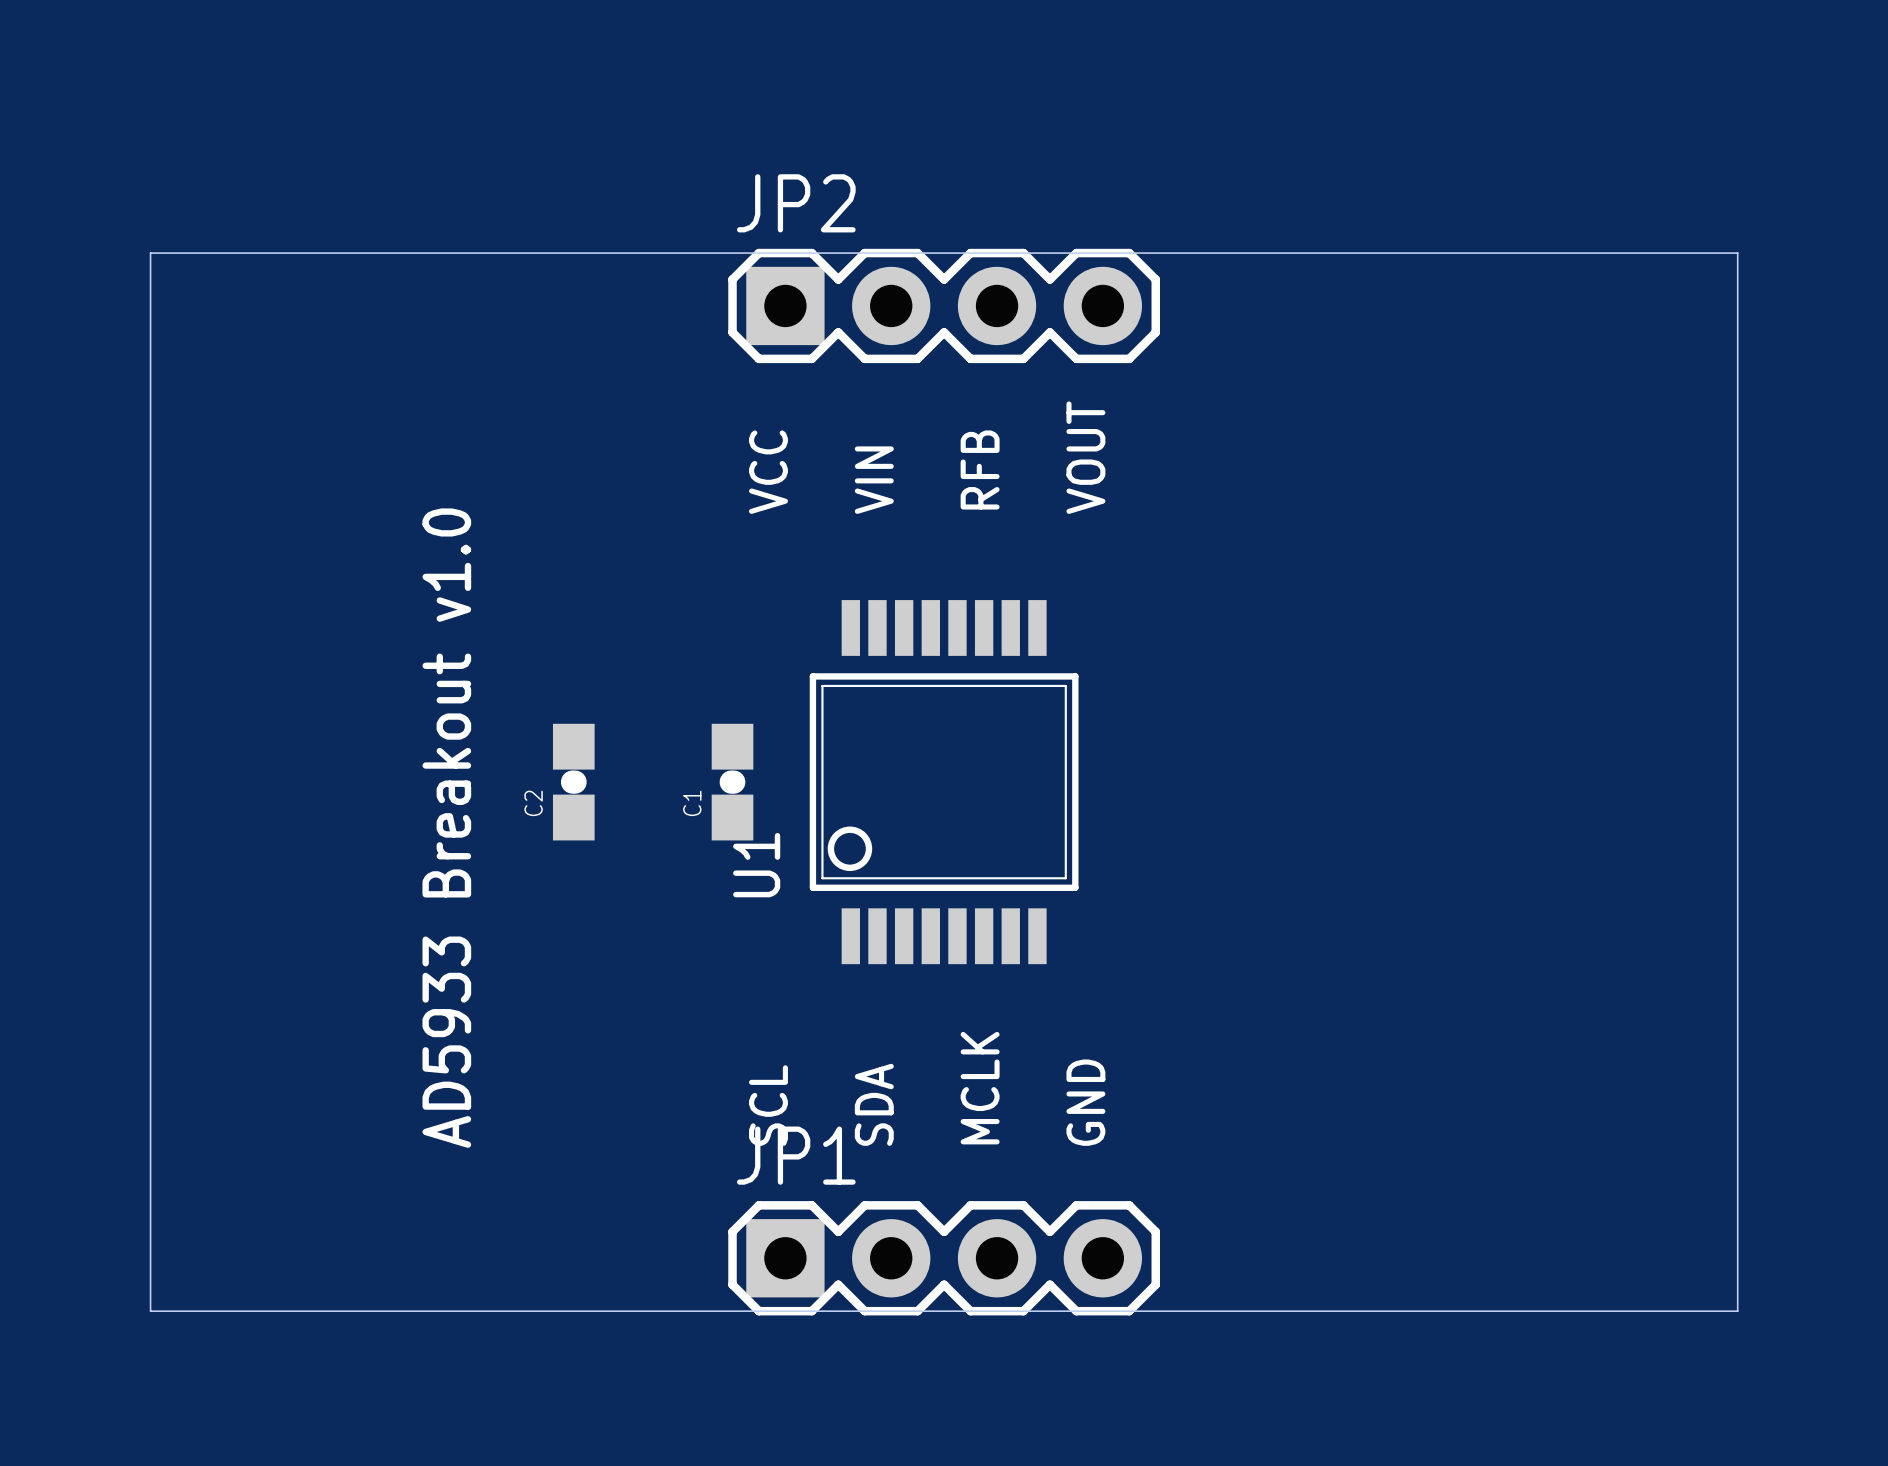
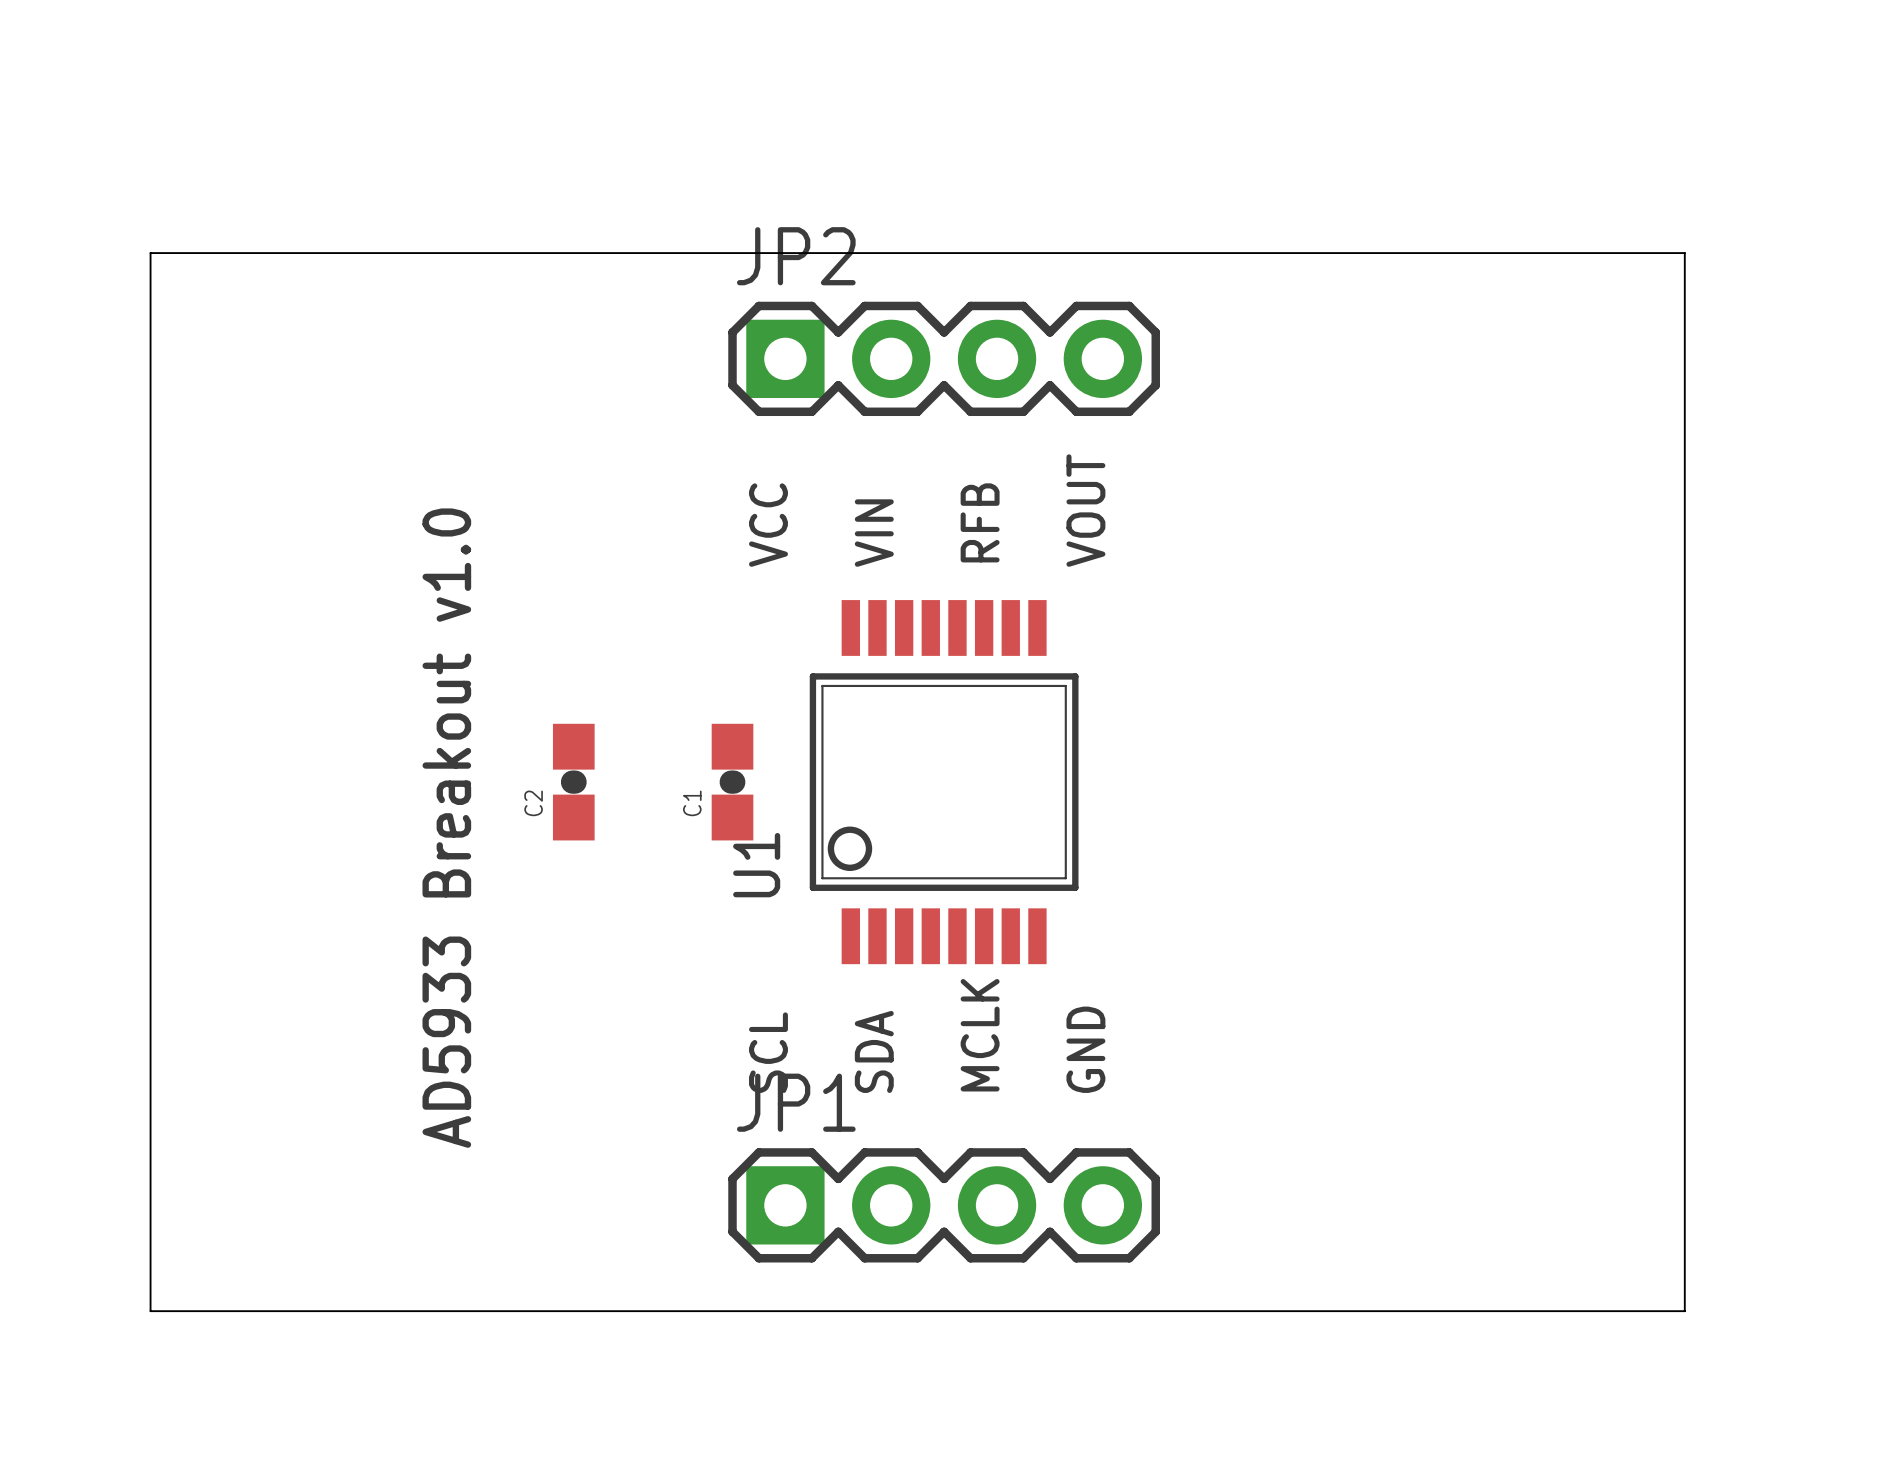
board edge: (1684, 253) (1737, 253) (1737, 1311) (1684, 1311) -> (1684, 253) (1684, 1311)
JP2 position: (944, 305) -> (944, 358)
text position: VOUT (1085, 457) -> VOUT (1085, 510)
text position: RFB (980, 469) -> RFB (980, 522)
text position: VCC (768, 472) -> VCC (768, 525)
text position: VIN (874, 480) -> VIN (874, 533)
text position: MCLK (980, 1088) -> MCLK (980, 1035)
text position: GND (1085, 1102) -> GND (1085, 1049)
text position: SDA (874, 1104) -> SDA (874, 1051)
text position: SCL (768, 1105) -> SCL (768, 1052)
JP1 position: (944, 1258) -> (944, 1205)

